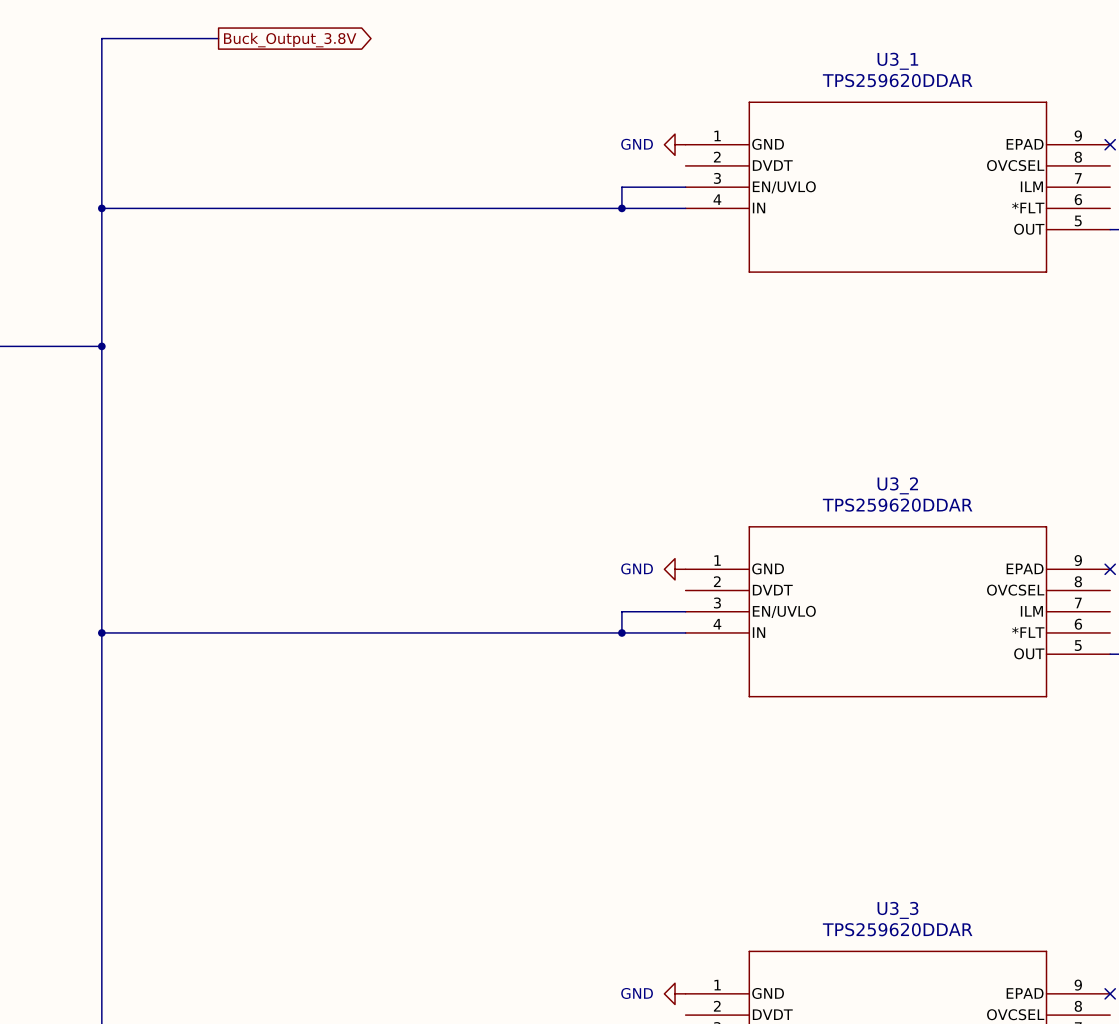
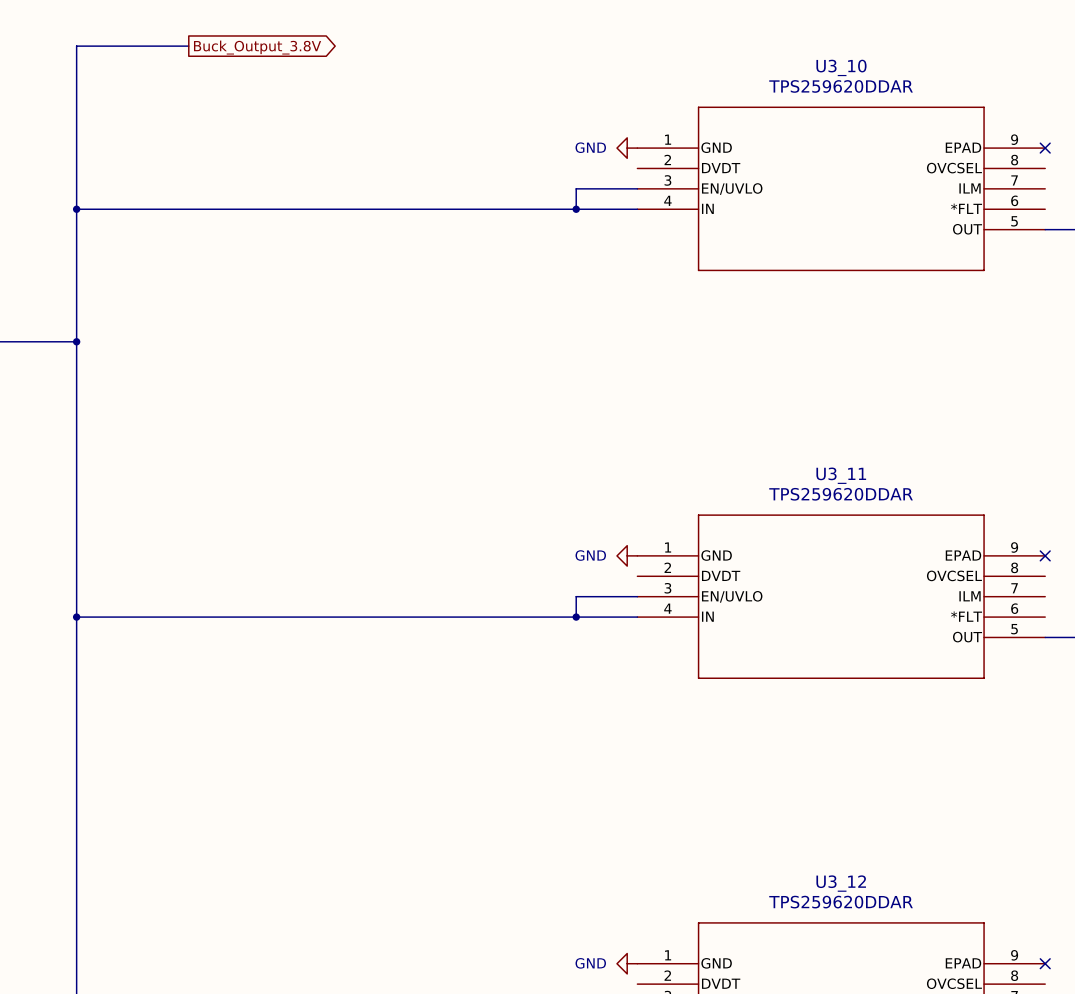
U3_1 name: U3_1 (897, 61) -> U3_10 (841, 67)
U3_2 name: U3_2 (897, 485) -> U3_11 (841, 475)
U3_3 name: U3_3 (897, 910) -> U3_12 (841, 883)

